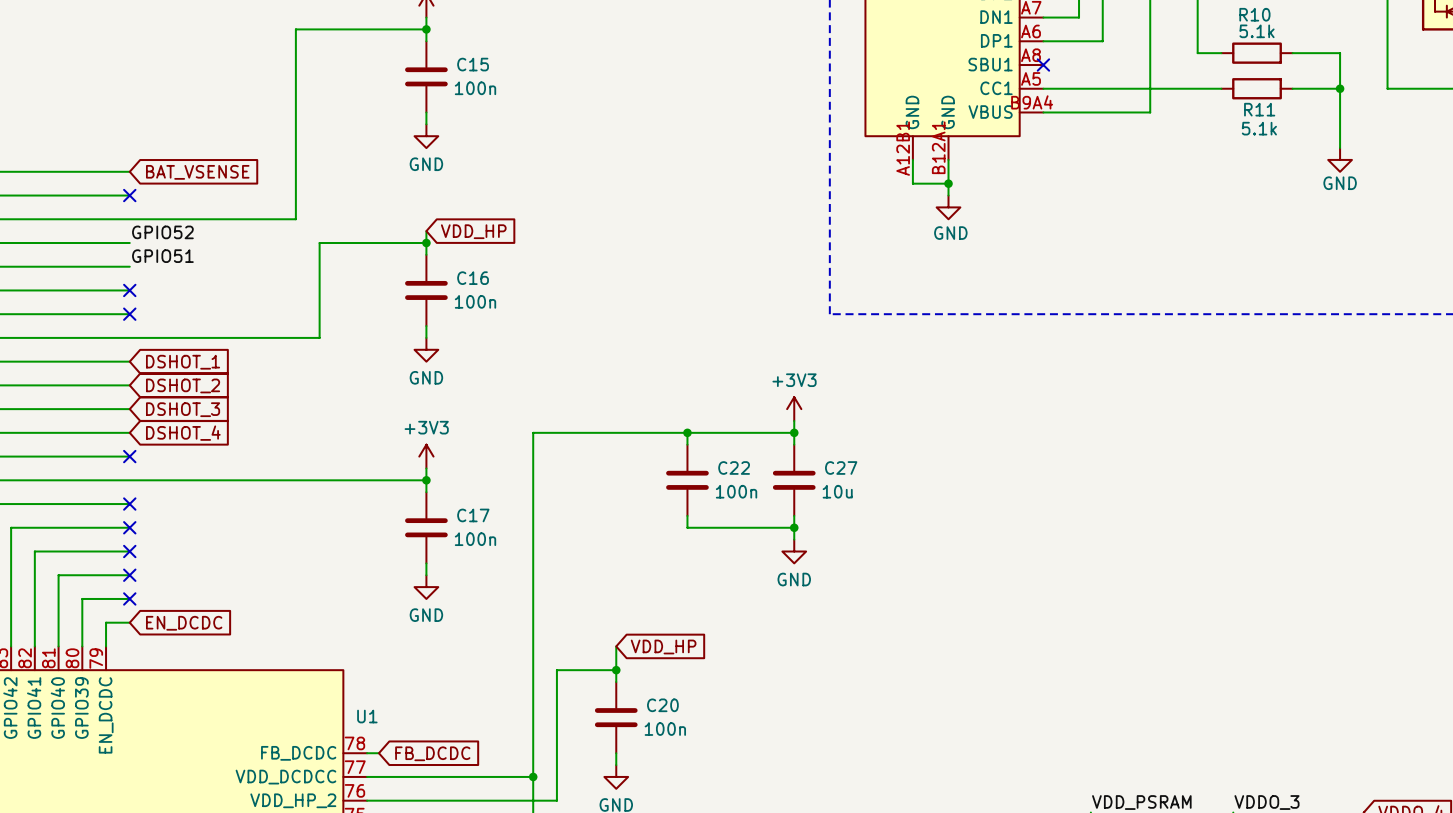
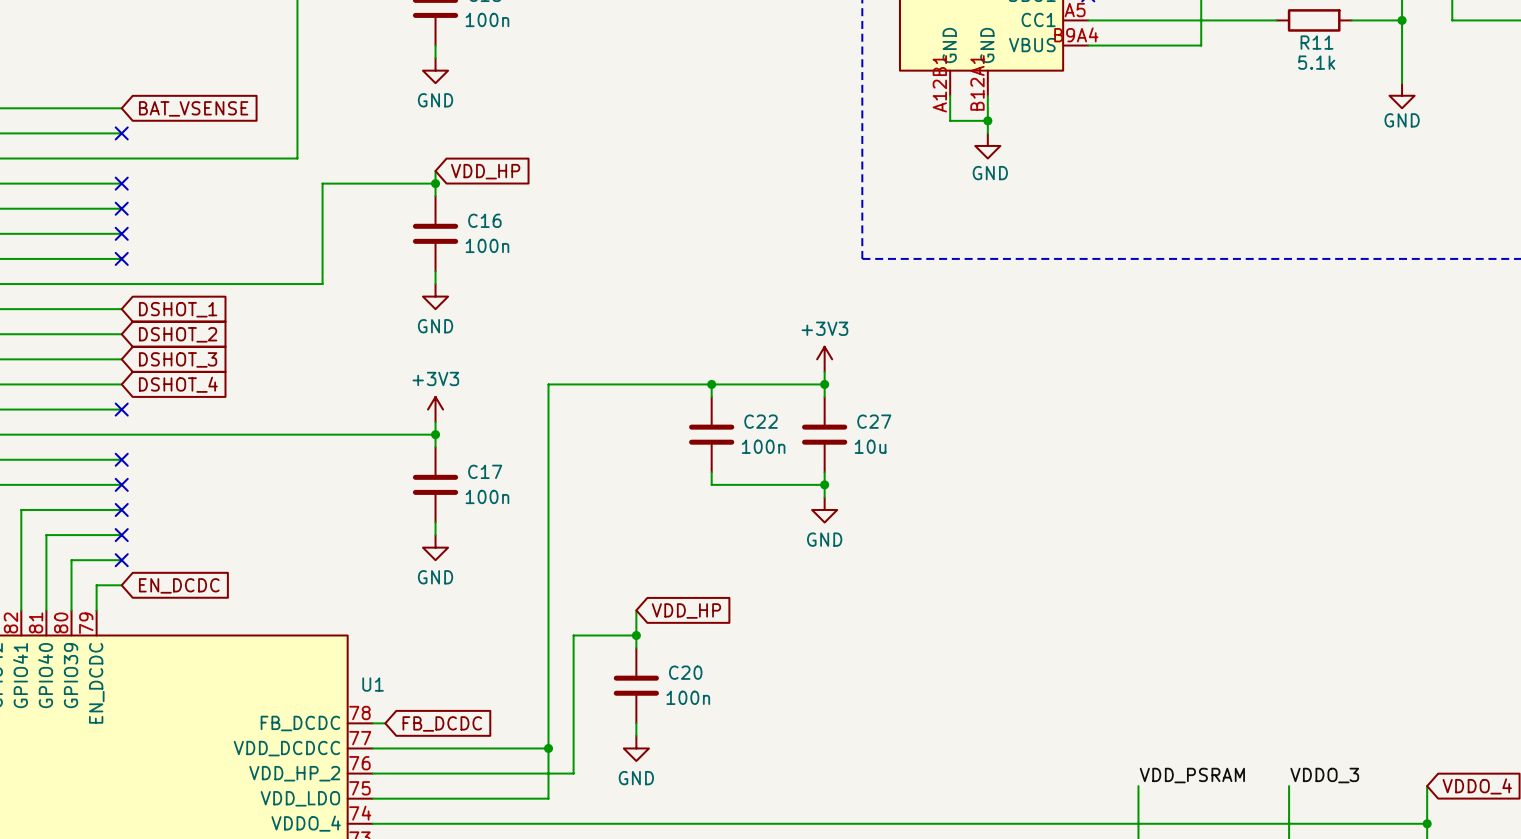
label: GPIO52 (162, 232) -> none
no-connect mark: none -> (121, 183)
label: GPIO51 (162, 256) -> none
no-connect mark: none -> (121, 208)

